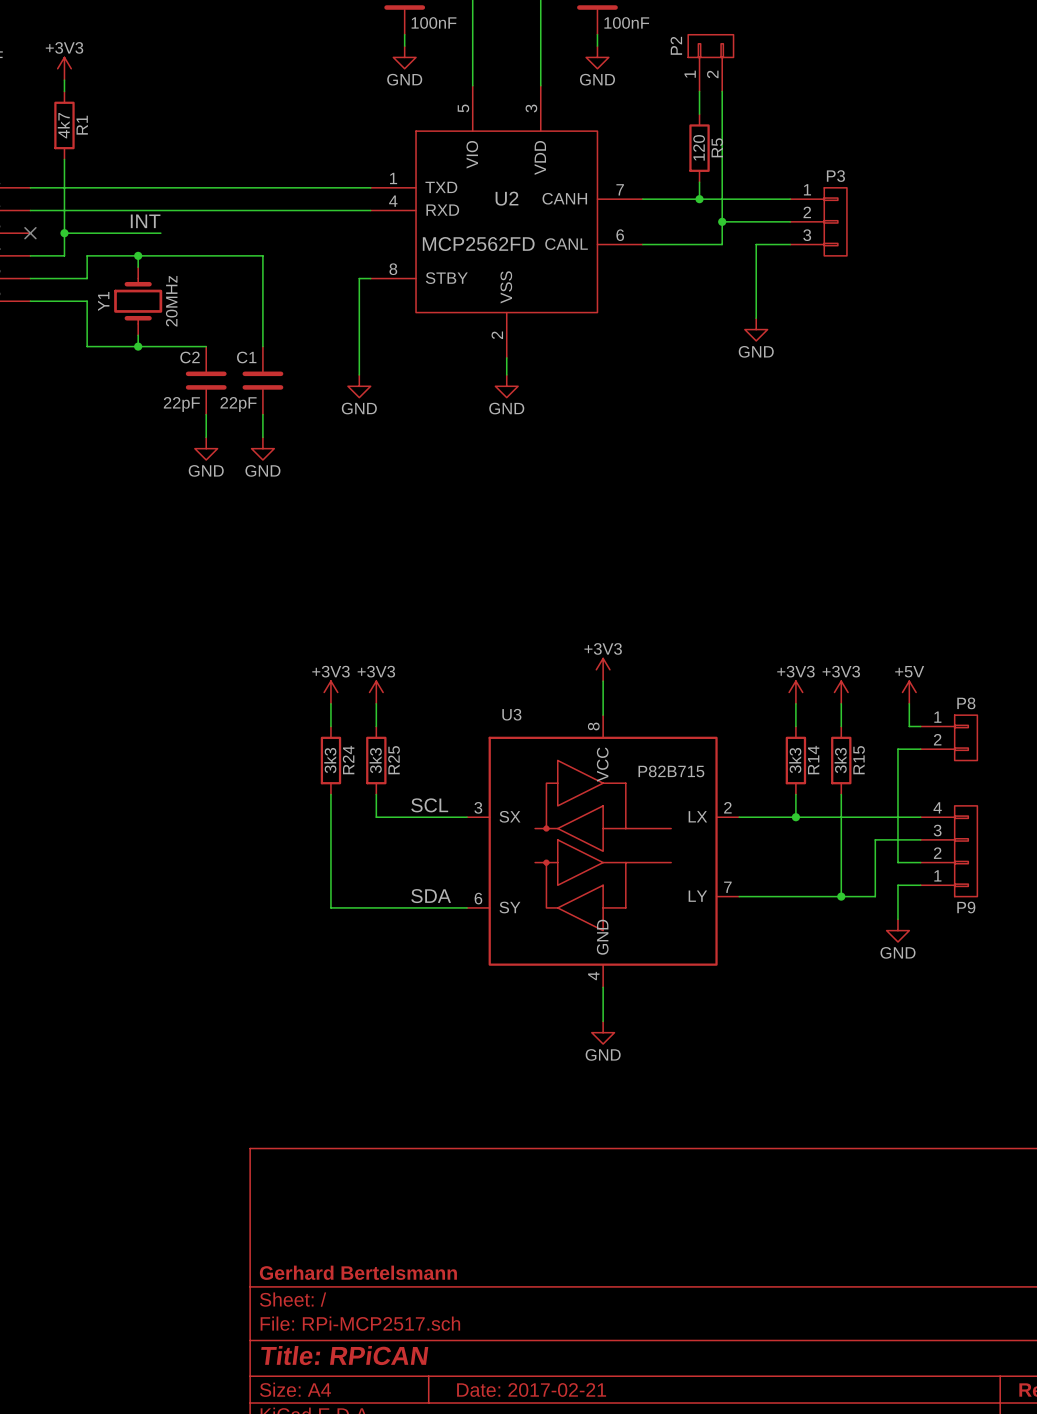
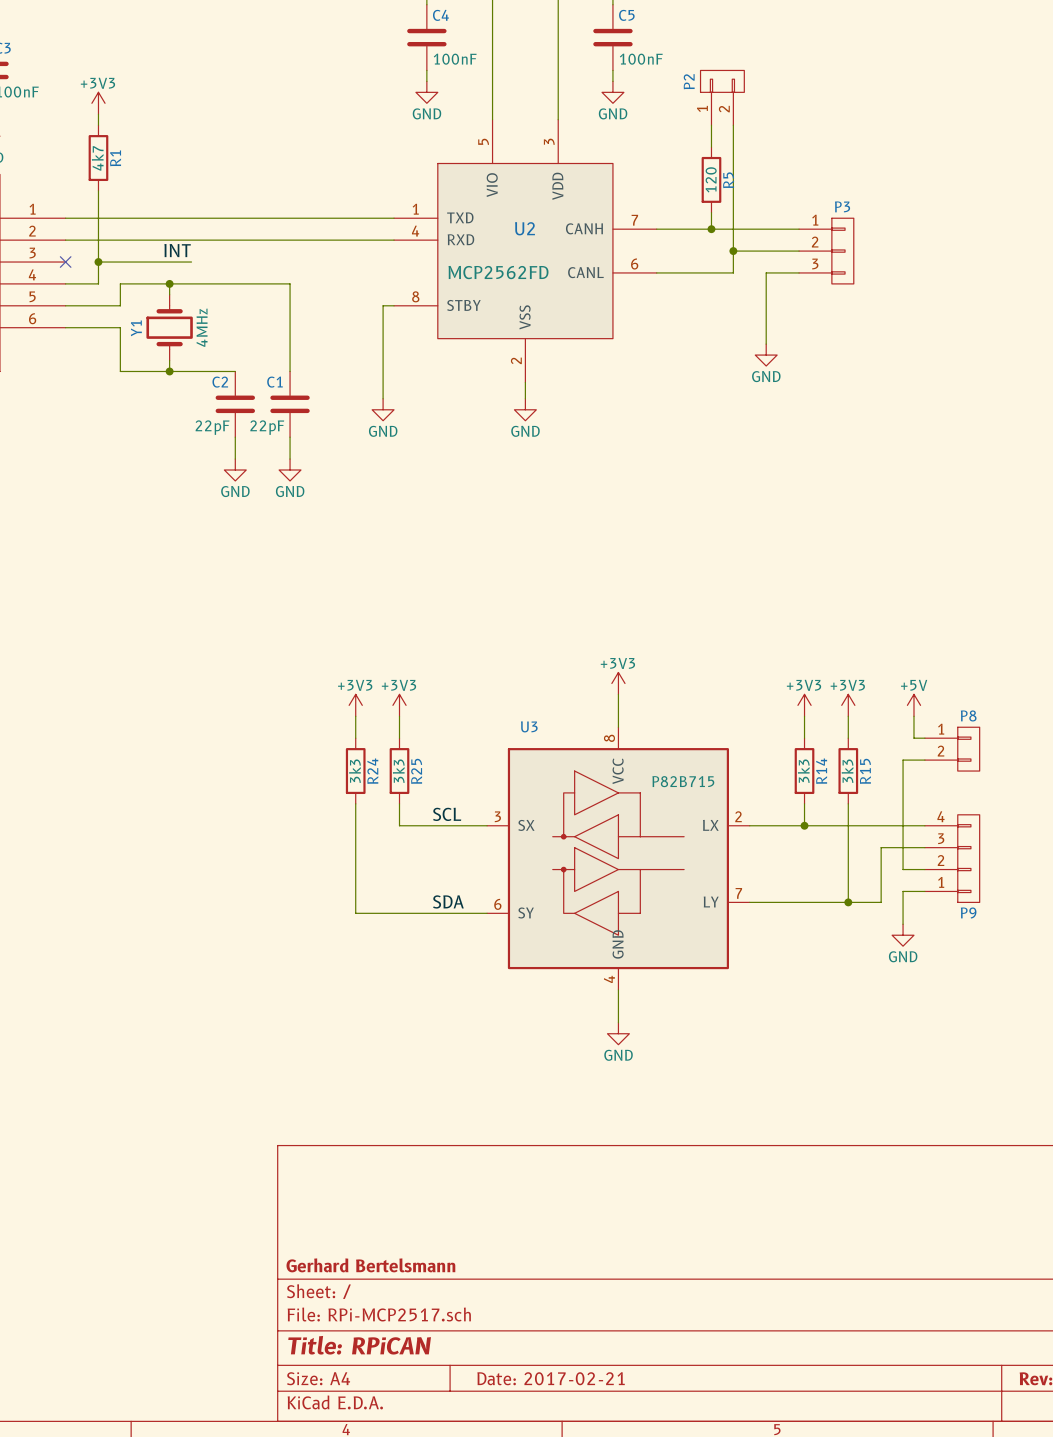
Y1 value: 20MHz (171, 301) -> 4MHz (202, 327)

